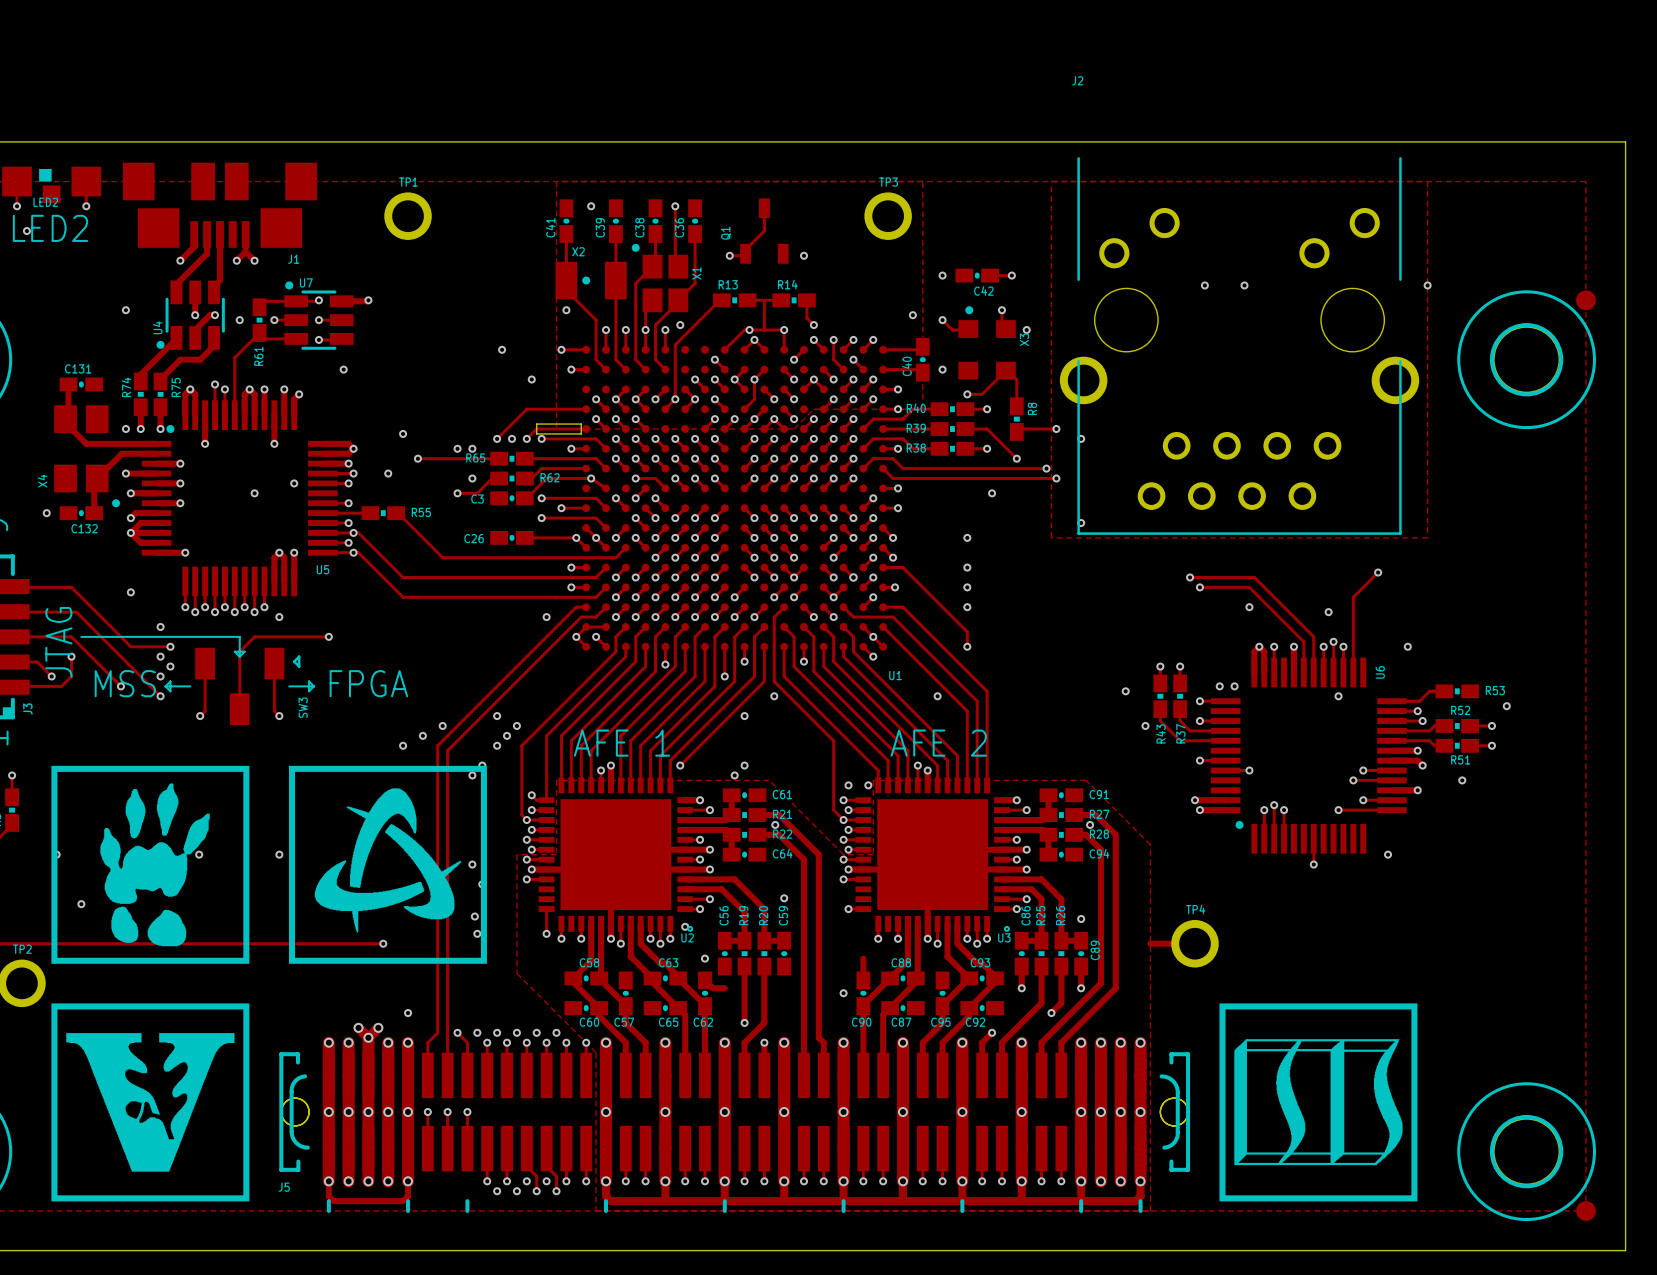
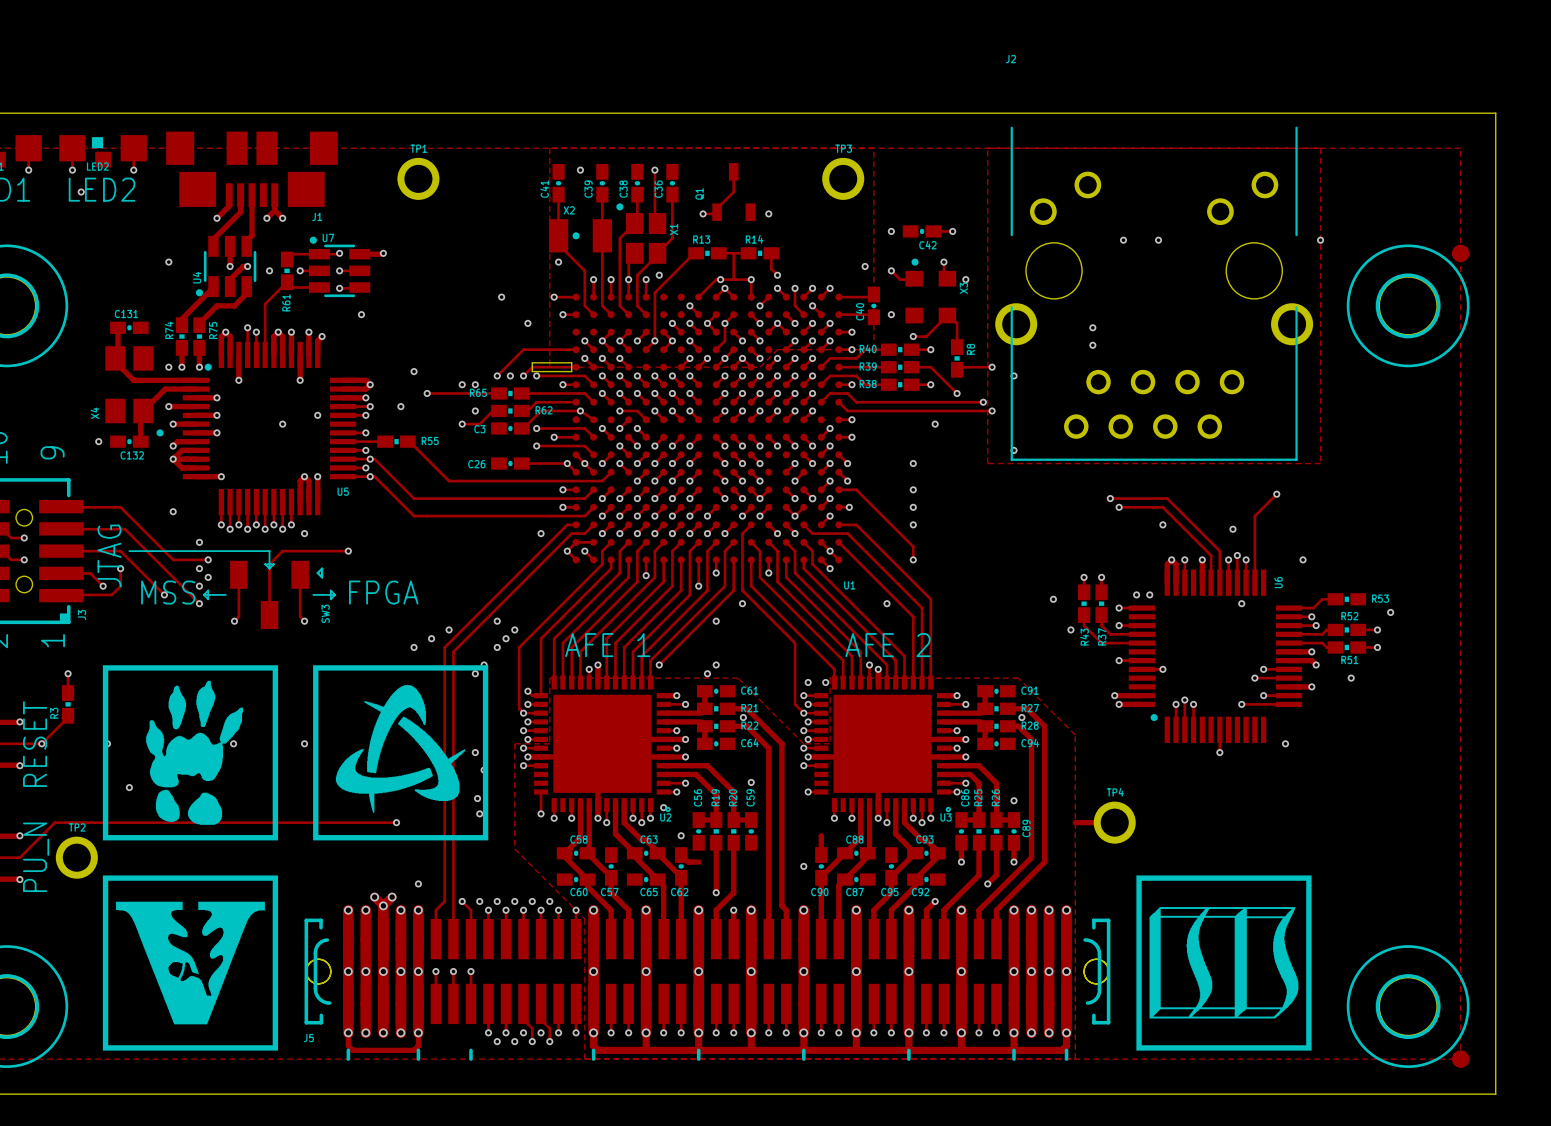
via: none -> (1092, 327)
via: none -> (1092, 345)

